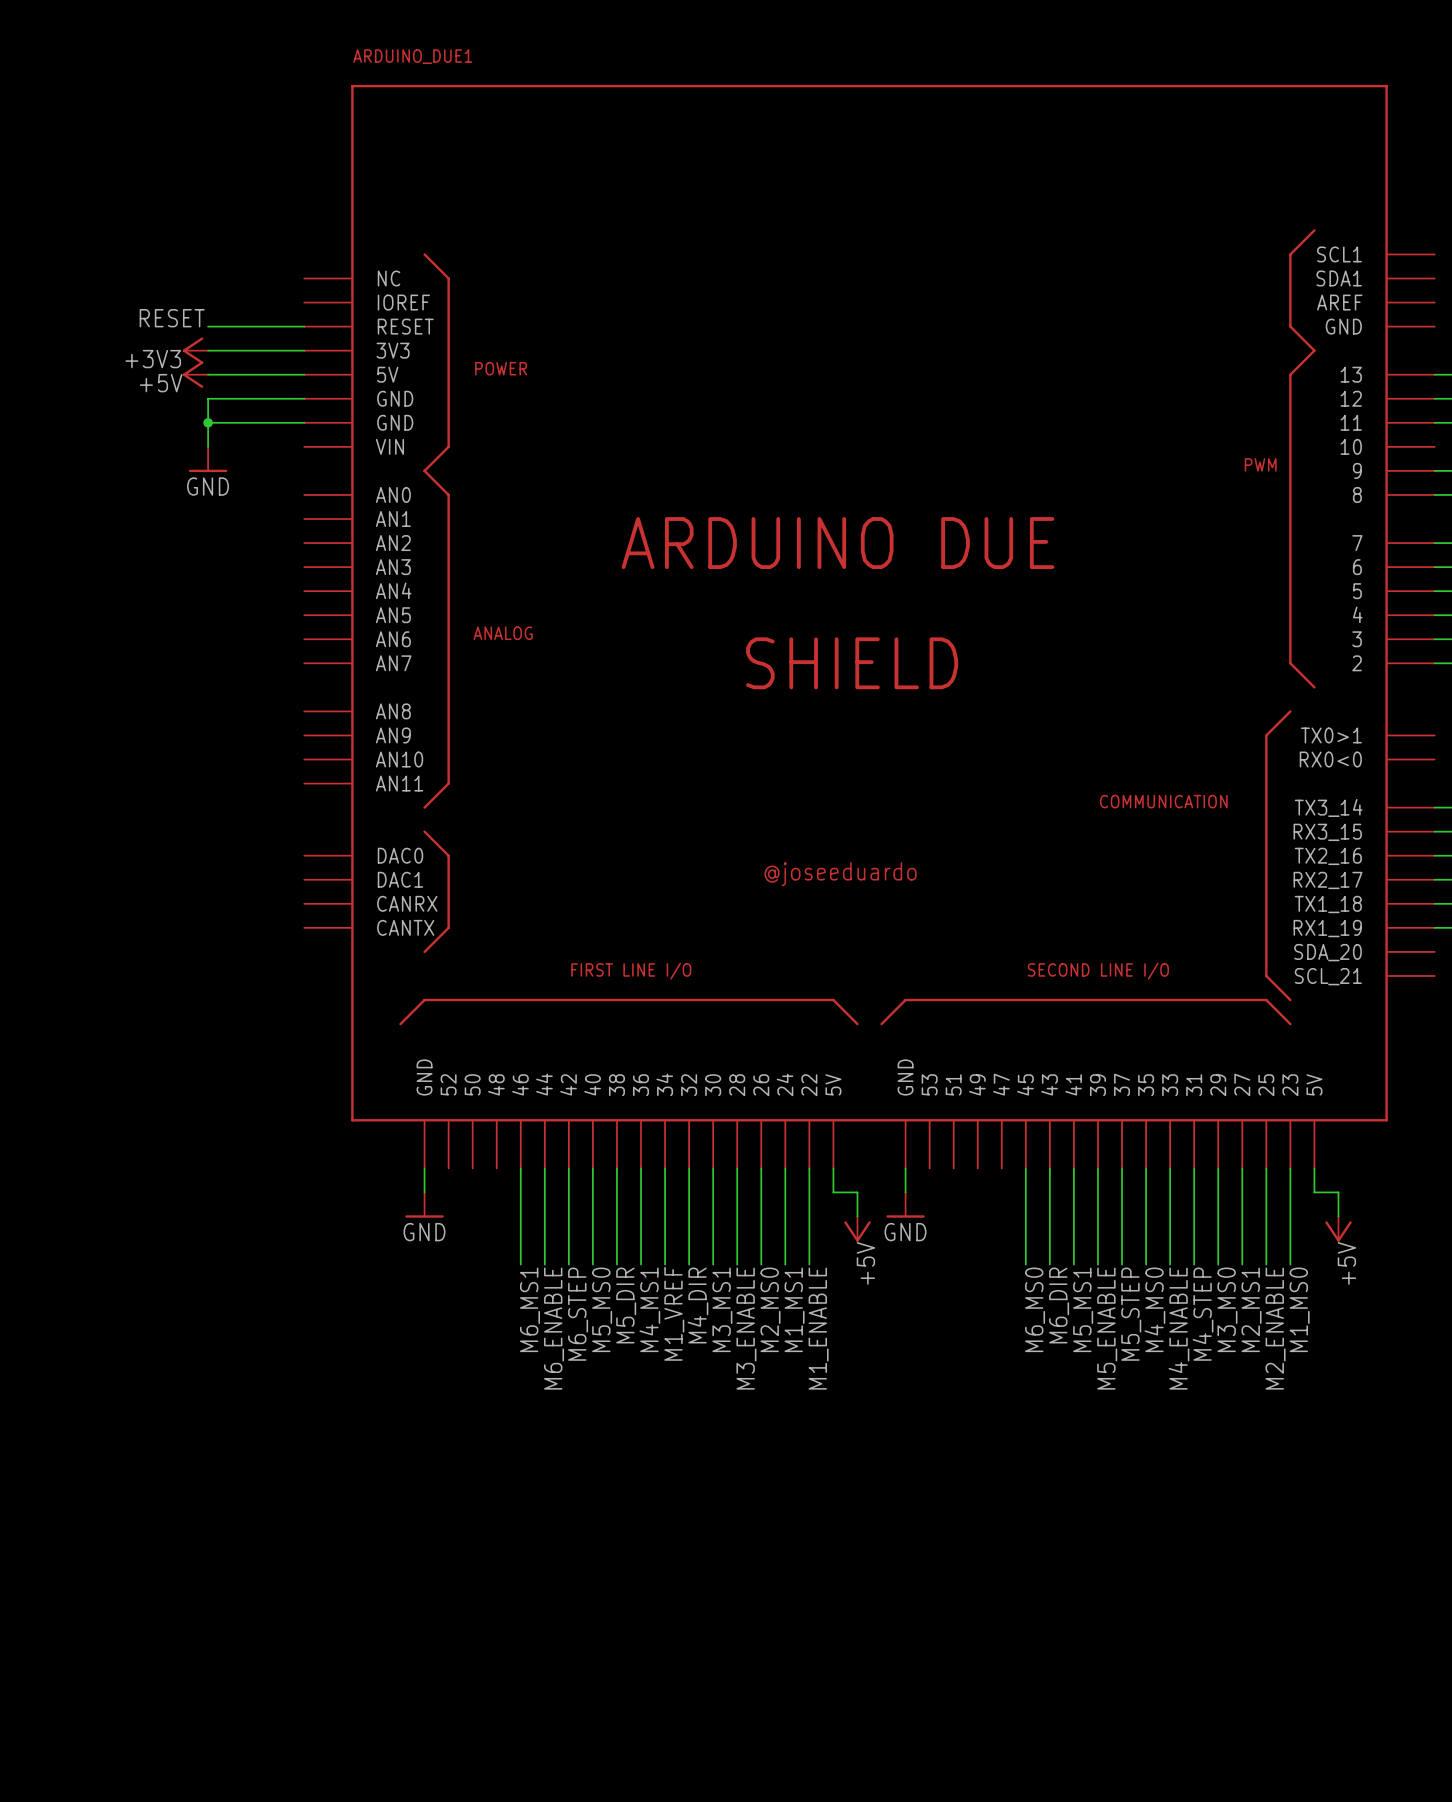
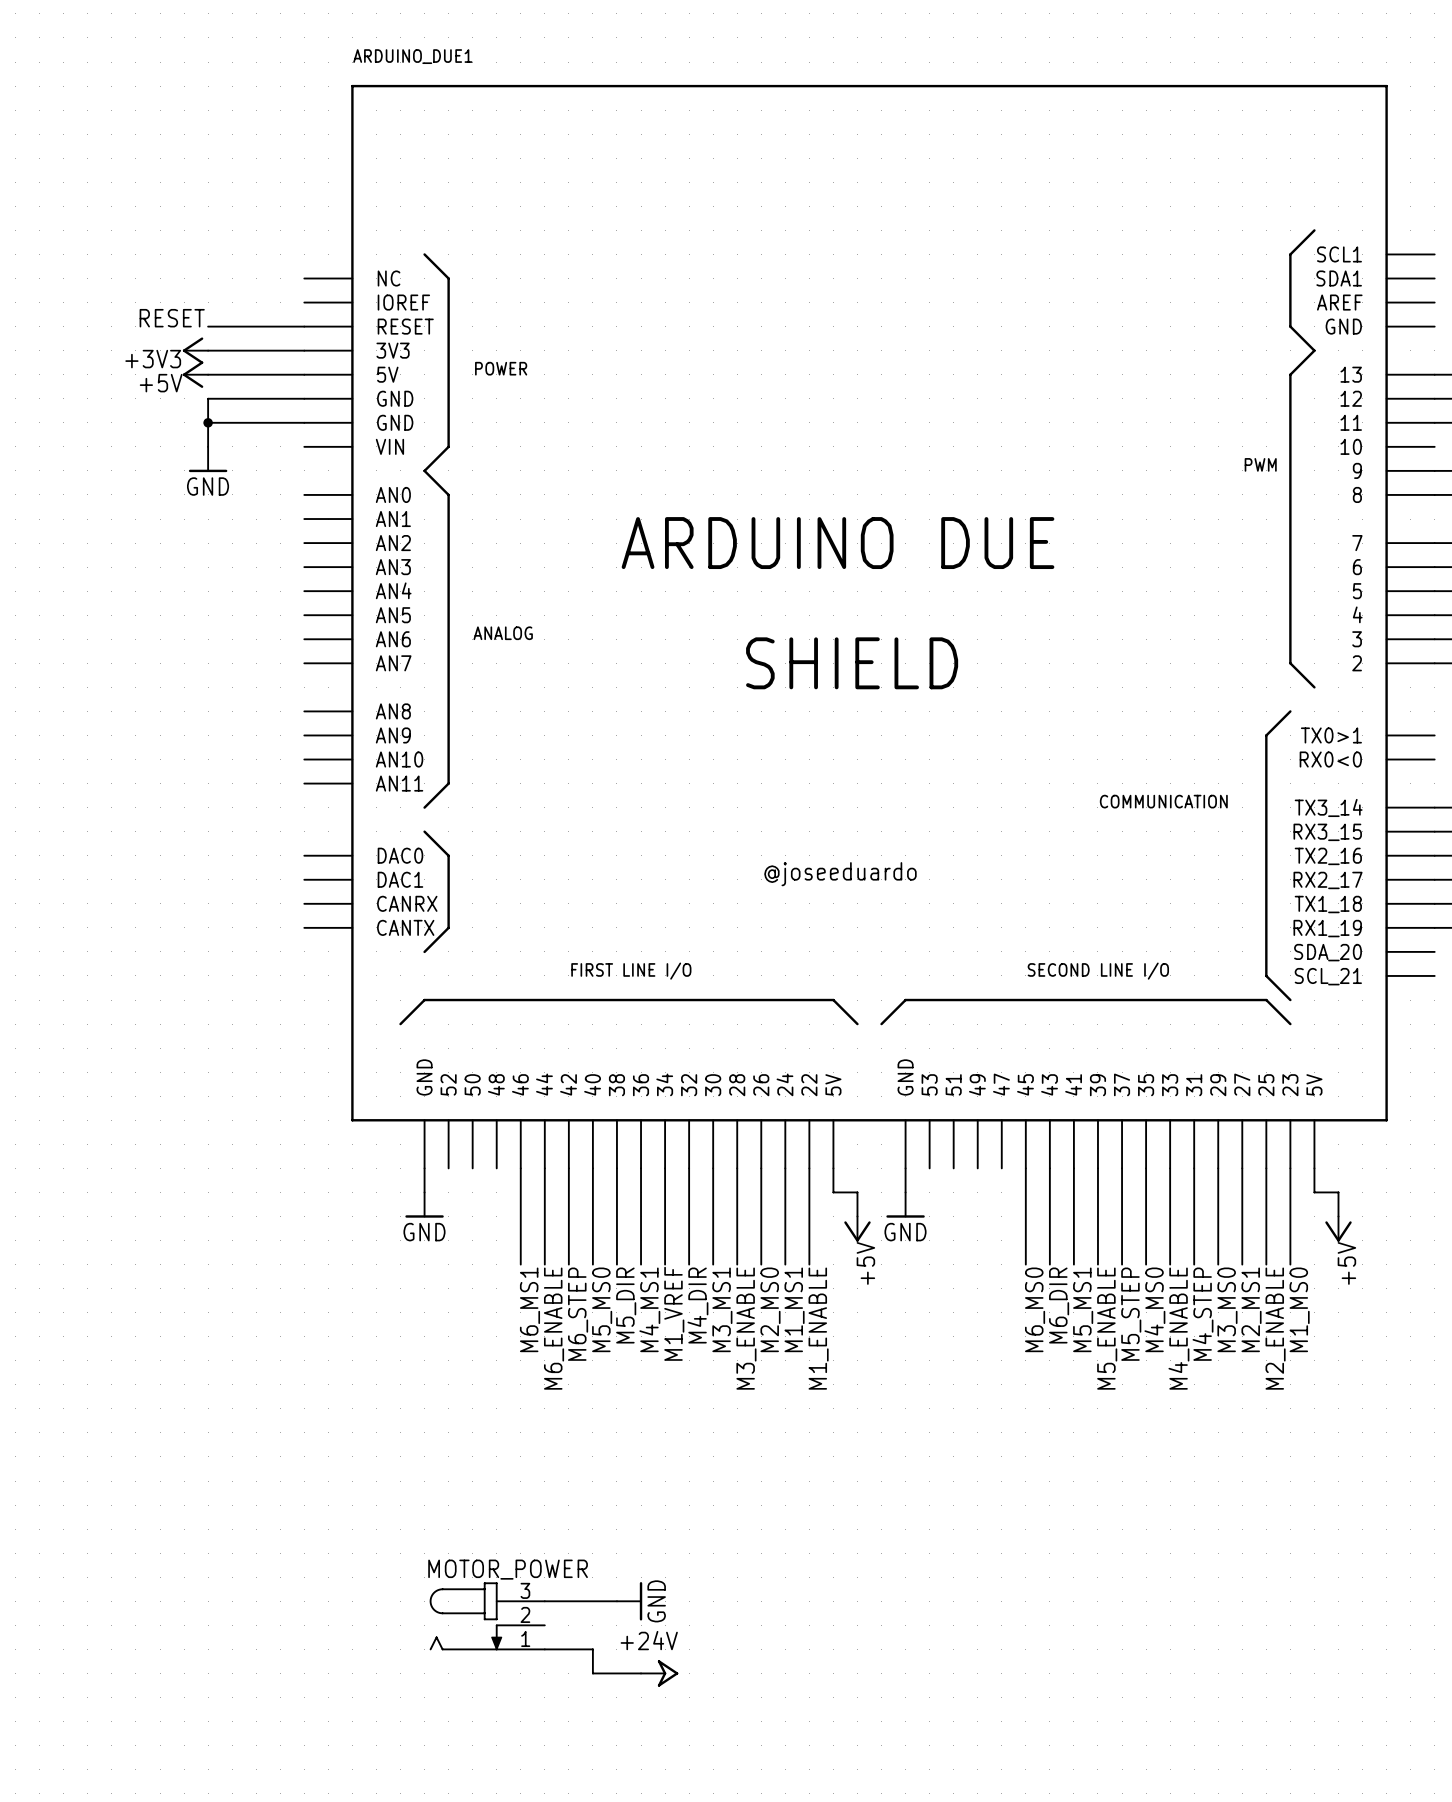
wire: none -> (544, 1601) (616, 1601)
power symbol: none -> GND (629, 1601)
MOTOR_POWER: none -> (487, 1616)
wire: none -> (544, 1649) (592, 1649) (592, 1673) (641, 1673)
power symbol: none -> +24V (659, 1673)

